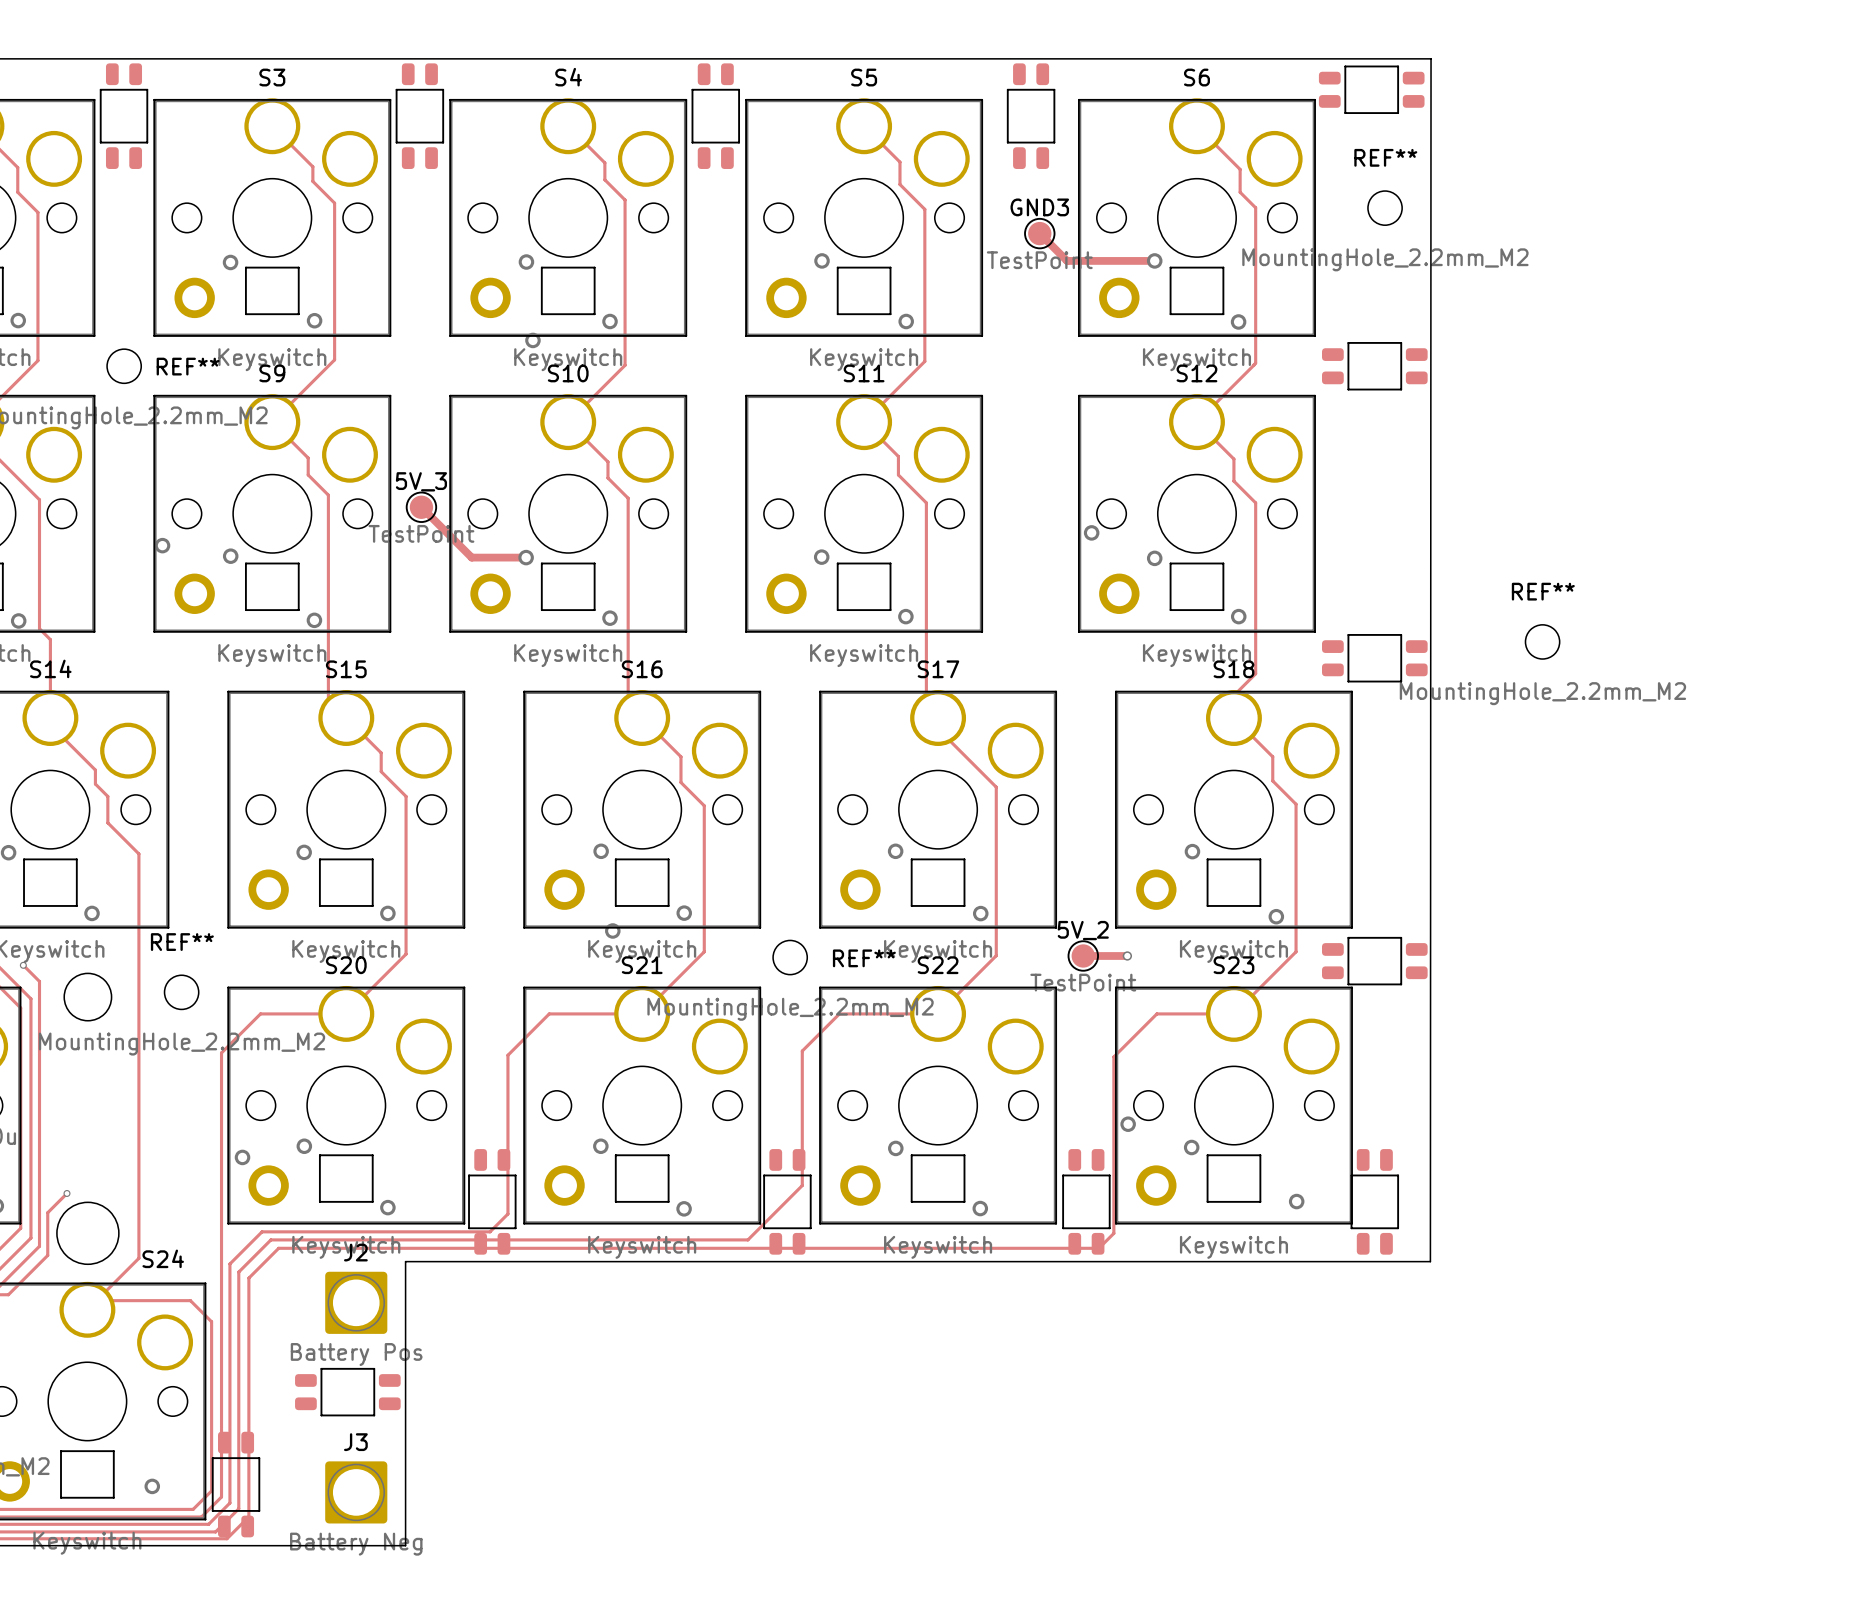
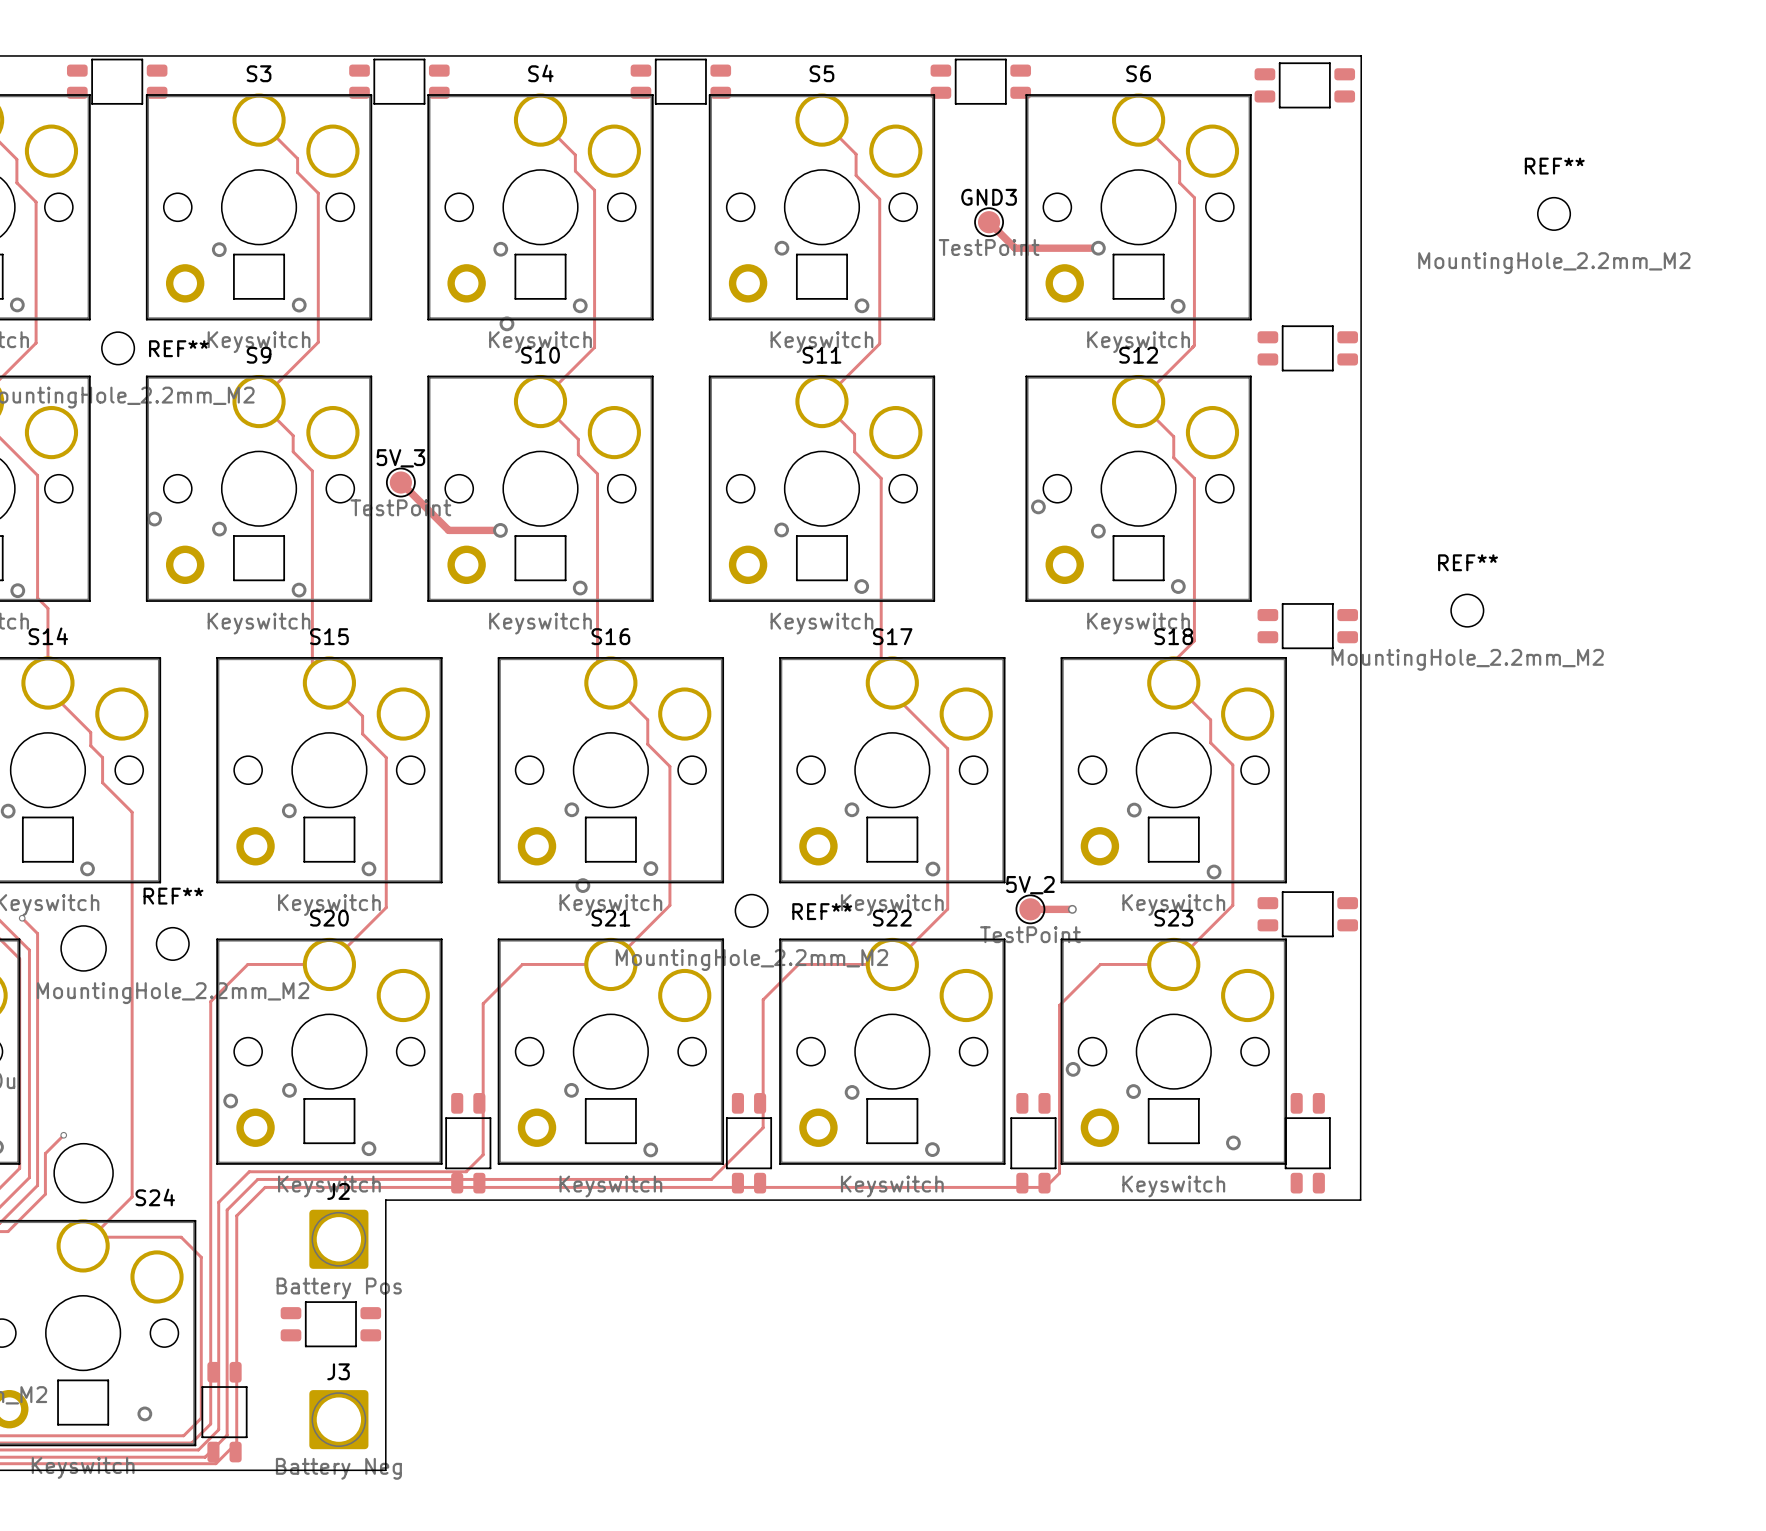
part rotation: 0° (124, 116) -> 90° clockwise (117, 81)
part rotation: 0° (419, 116) -> 90° clockwise (399, 81)
part rotation: 0° (715, 116) -> 90° clockwise (680, 81)
part rotation: 0° (1031, 116) -> 90° clockwise (980, 81)
REF** position: (1385, 208) -> (1554, 213)

